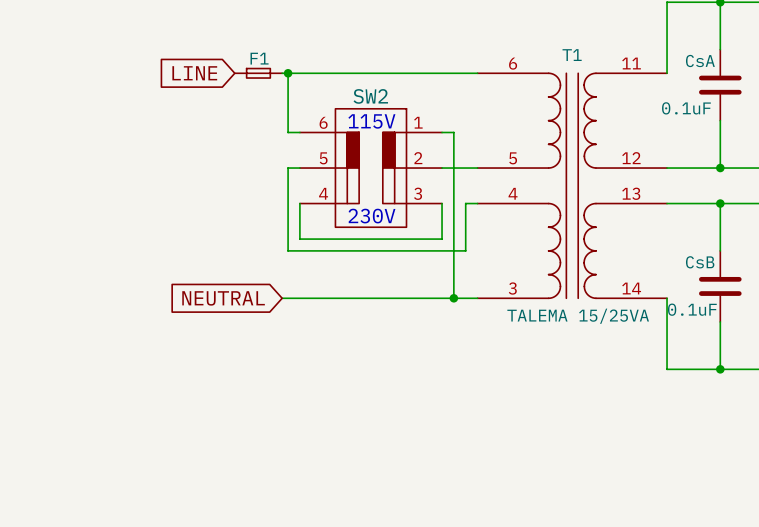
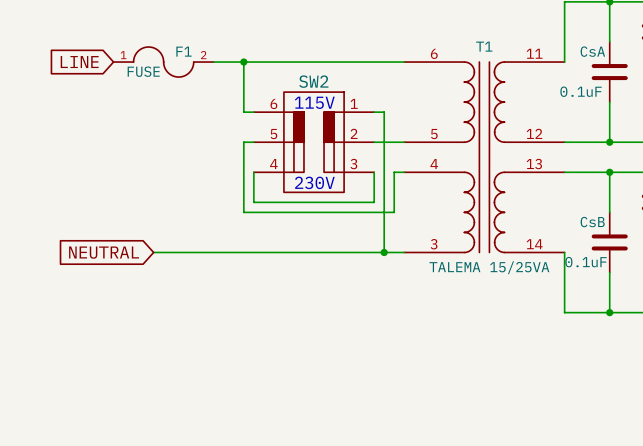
F1 name position: F1 (259, 58) -> F1 (184, 51)
F1 symbol: [234, 68, 283, 79] -> [113, 46, 214, 78]
global label position: LINE (194, 73) -> LINE (79, 62)
F1 value: none -> FUSE (143, 71)
wire: none -> (153, 252) (238, 252)
global label position: NEUTRAL (223, 298) -> NEUTRAL (104, 252)

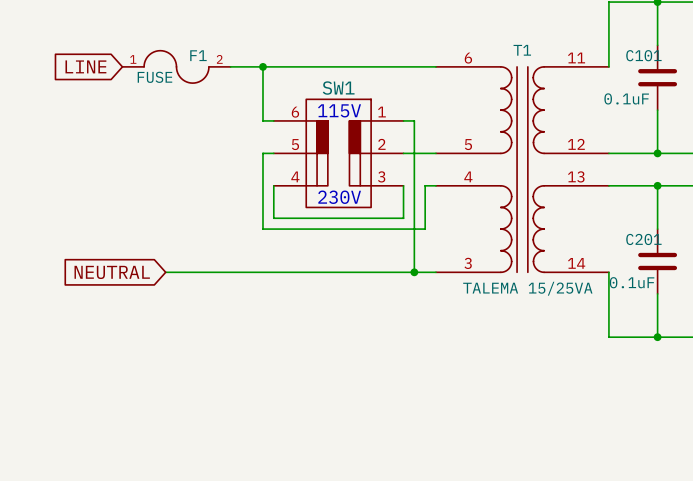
CsA name: CsA (592, 51) -> C101 (643, 55)
SW2 name: SW2 (313, 81) -> SW1 (338, 88)
CsB name: CsB (592, 222) -> C201 (643, 239)

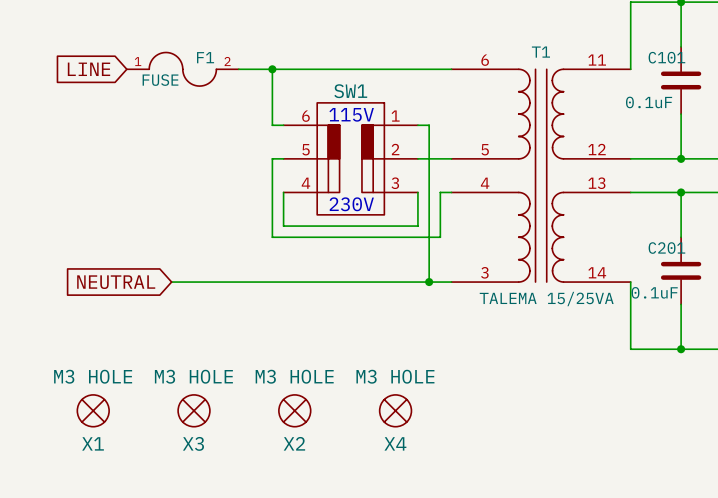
X1: none -> M3 HOLE (93, 410)
X3: none -> M3 HOLE (194, 410)
X2: none -> M3 HOLE (294, 410)
X4: none -> M3 HOLE (395, 410)

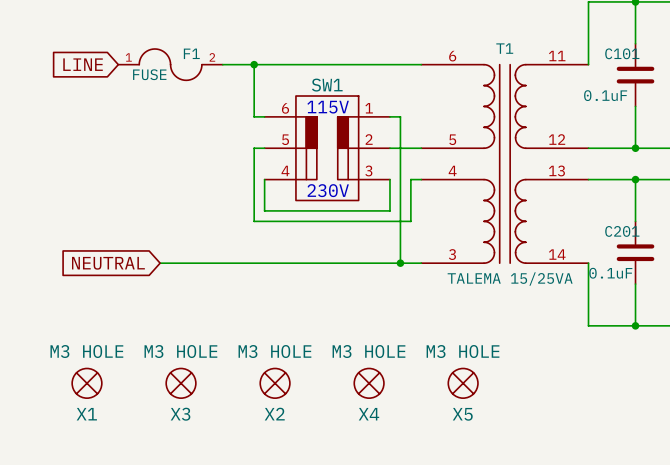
X5: none -> M3 HOLE (463, 383)

